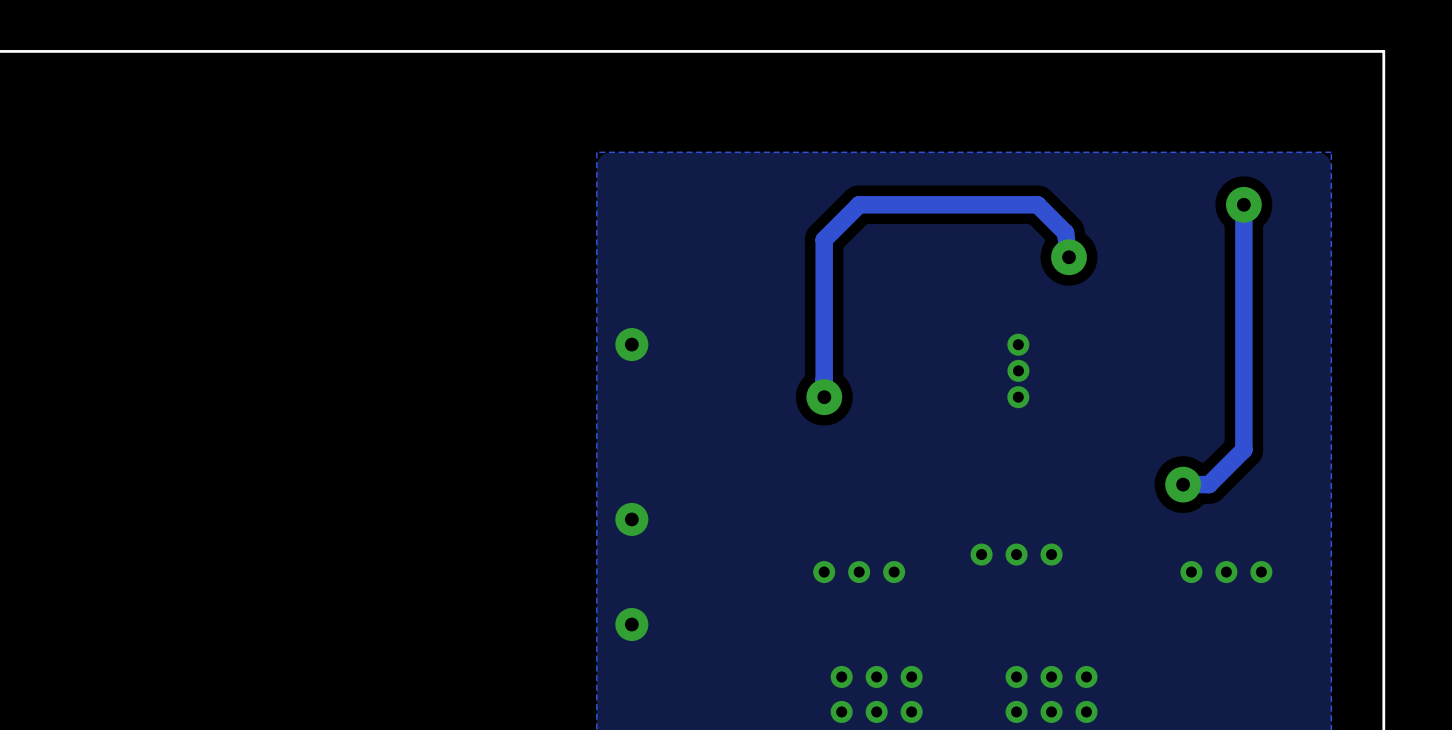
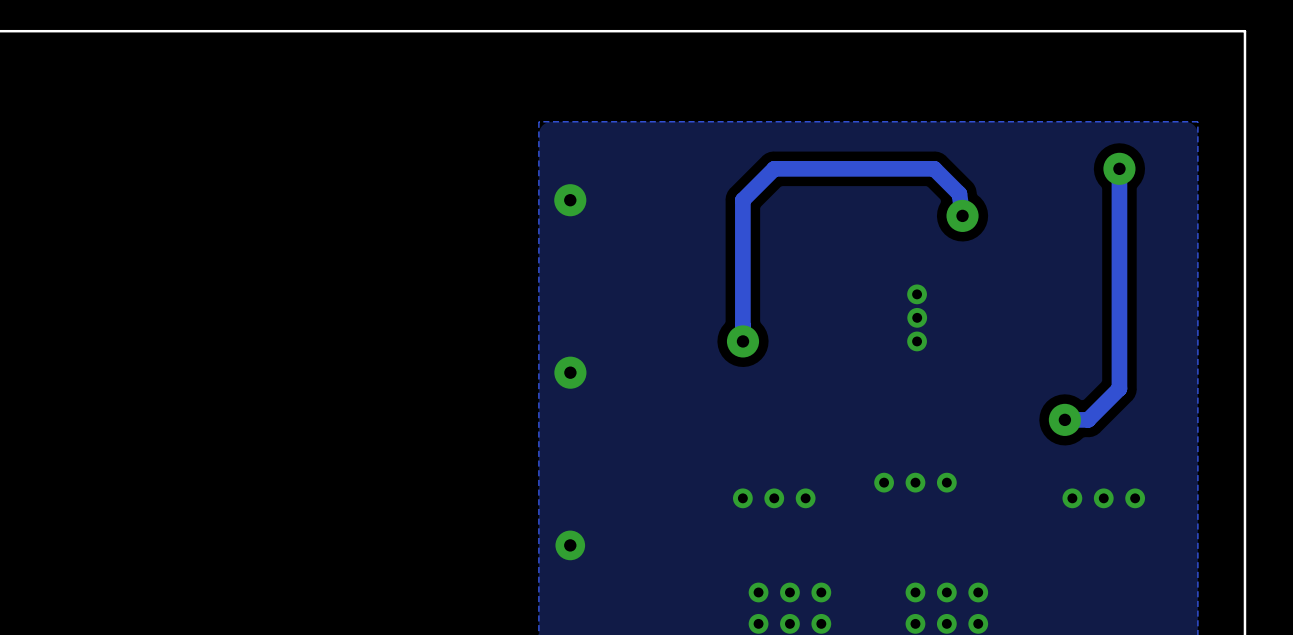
via: none -> (570, 200)
via: (631, 344) -> none
via: none -> (570, 372)
via: (631, 519) -> none

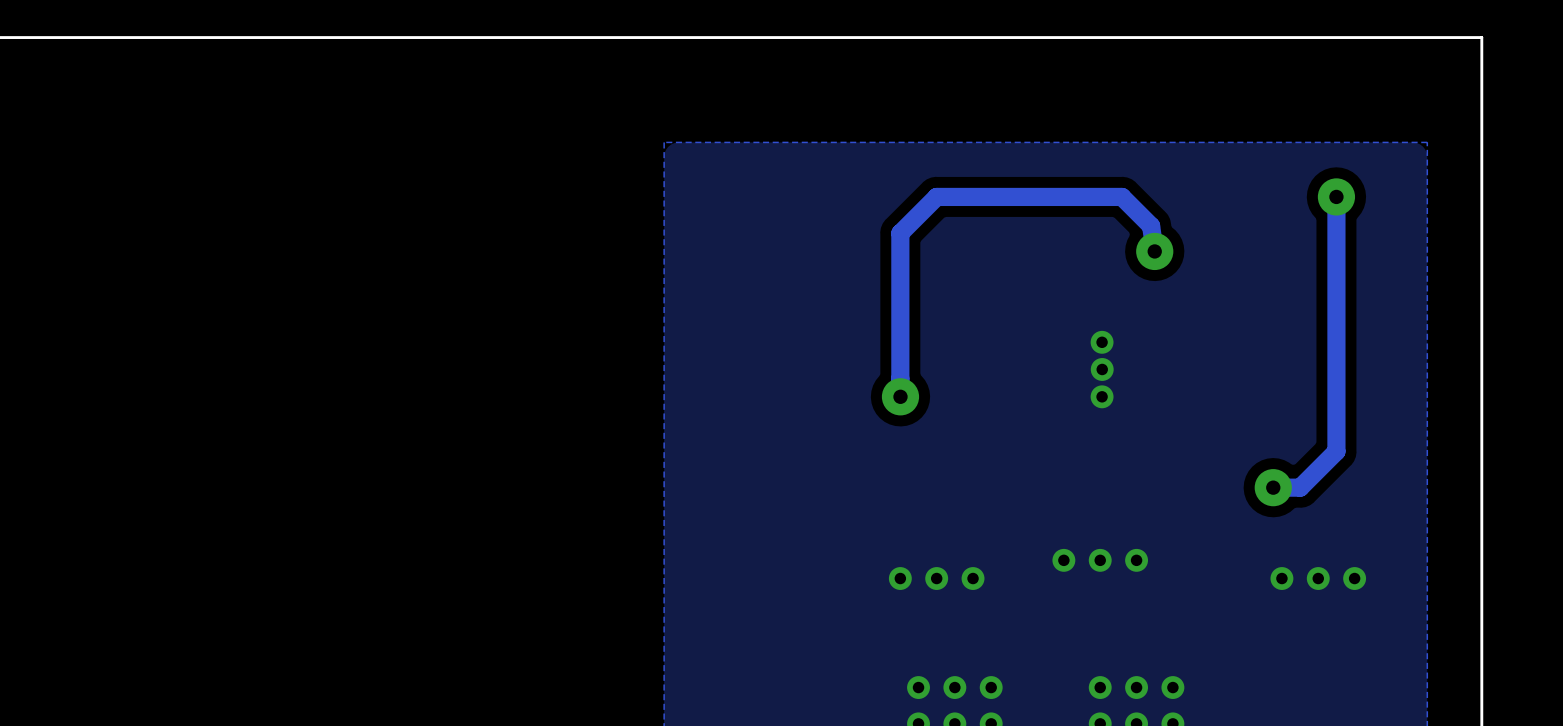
via: (570, 200) -> none
via: (570, 372) -> none
via: (570, 545) -> none

